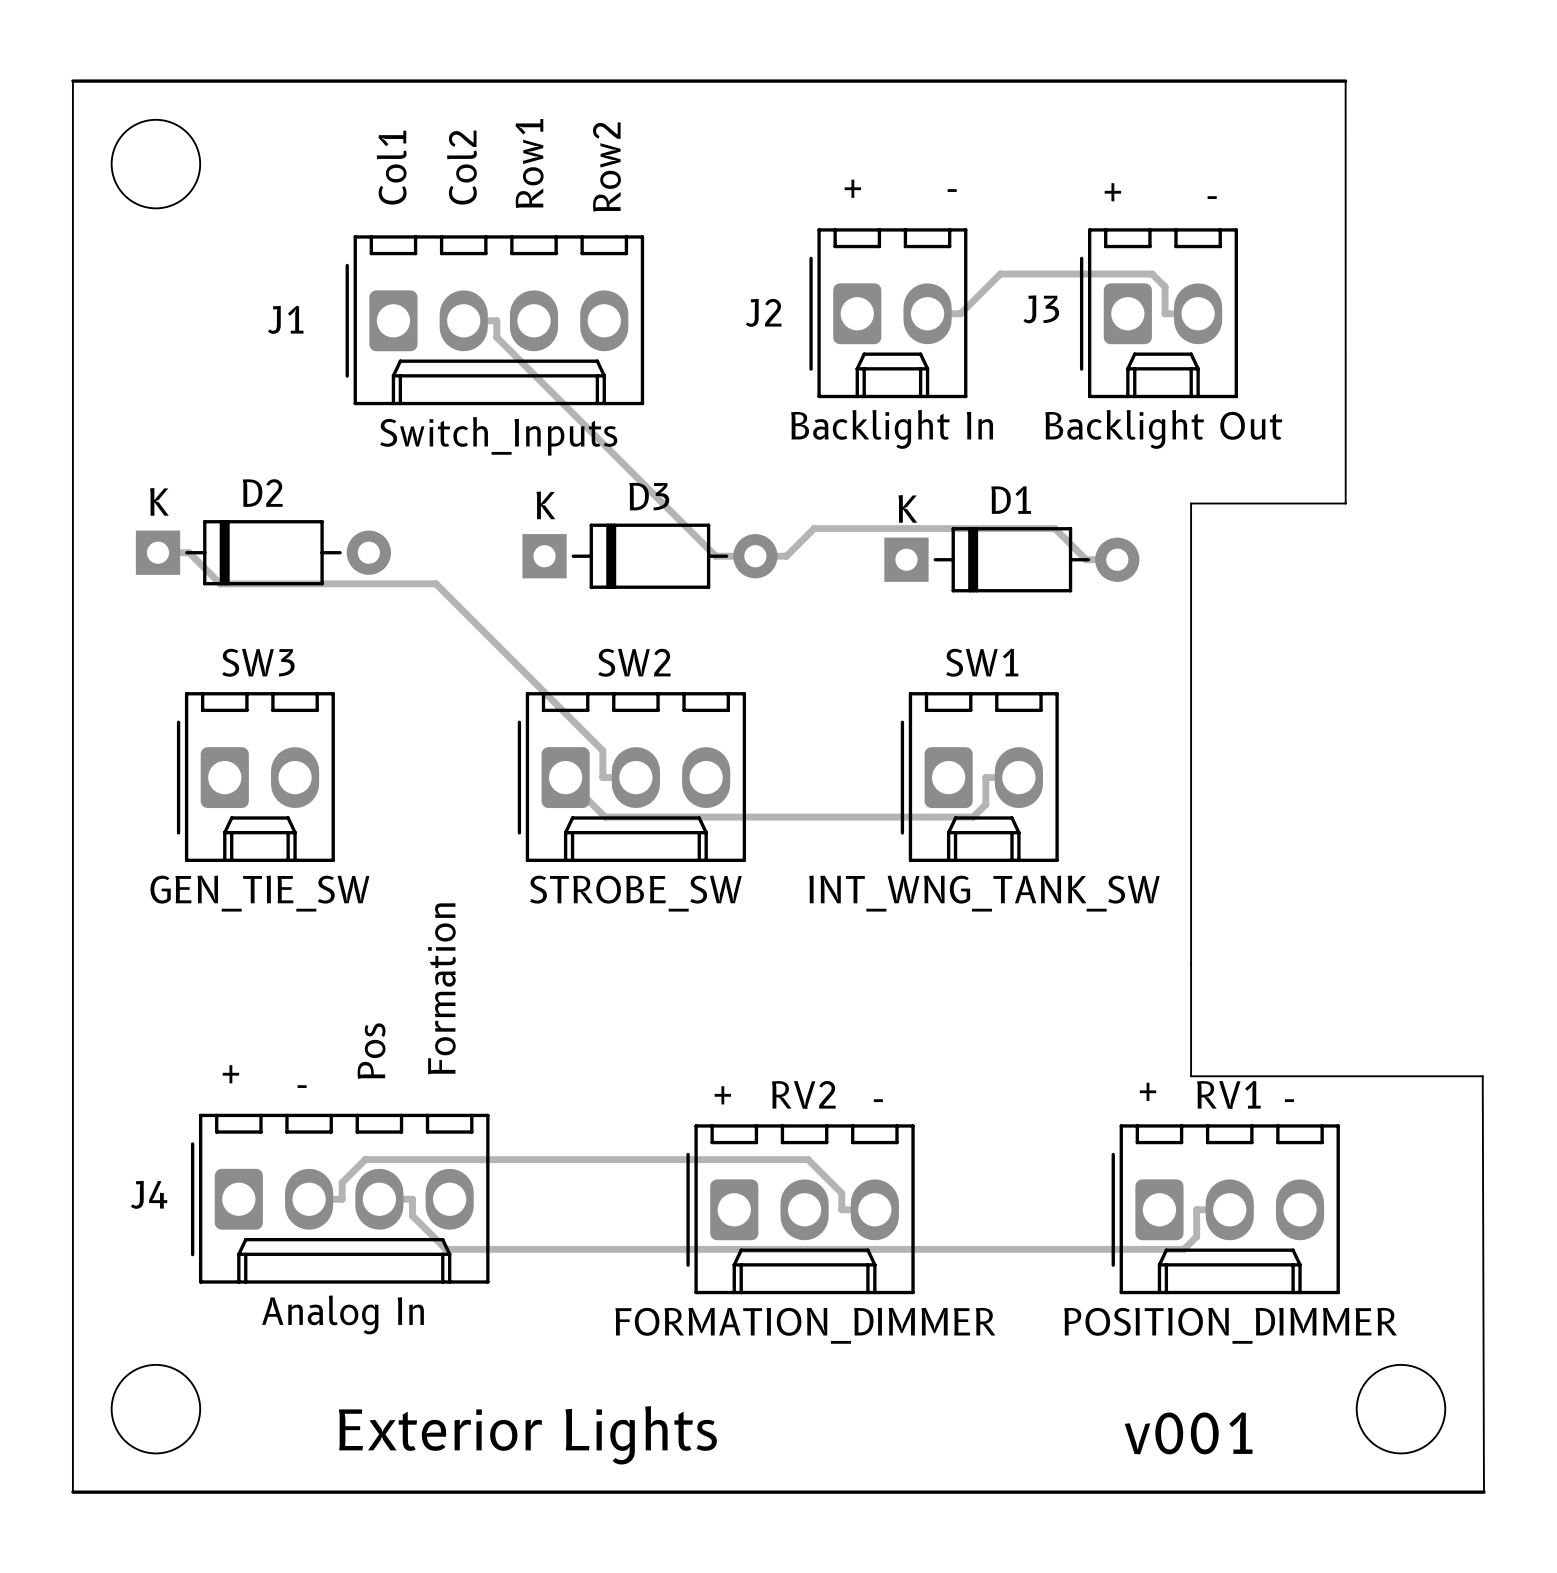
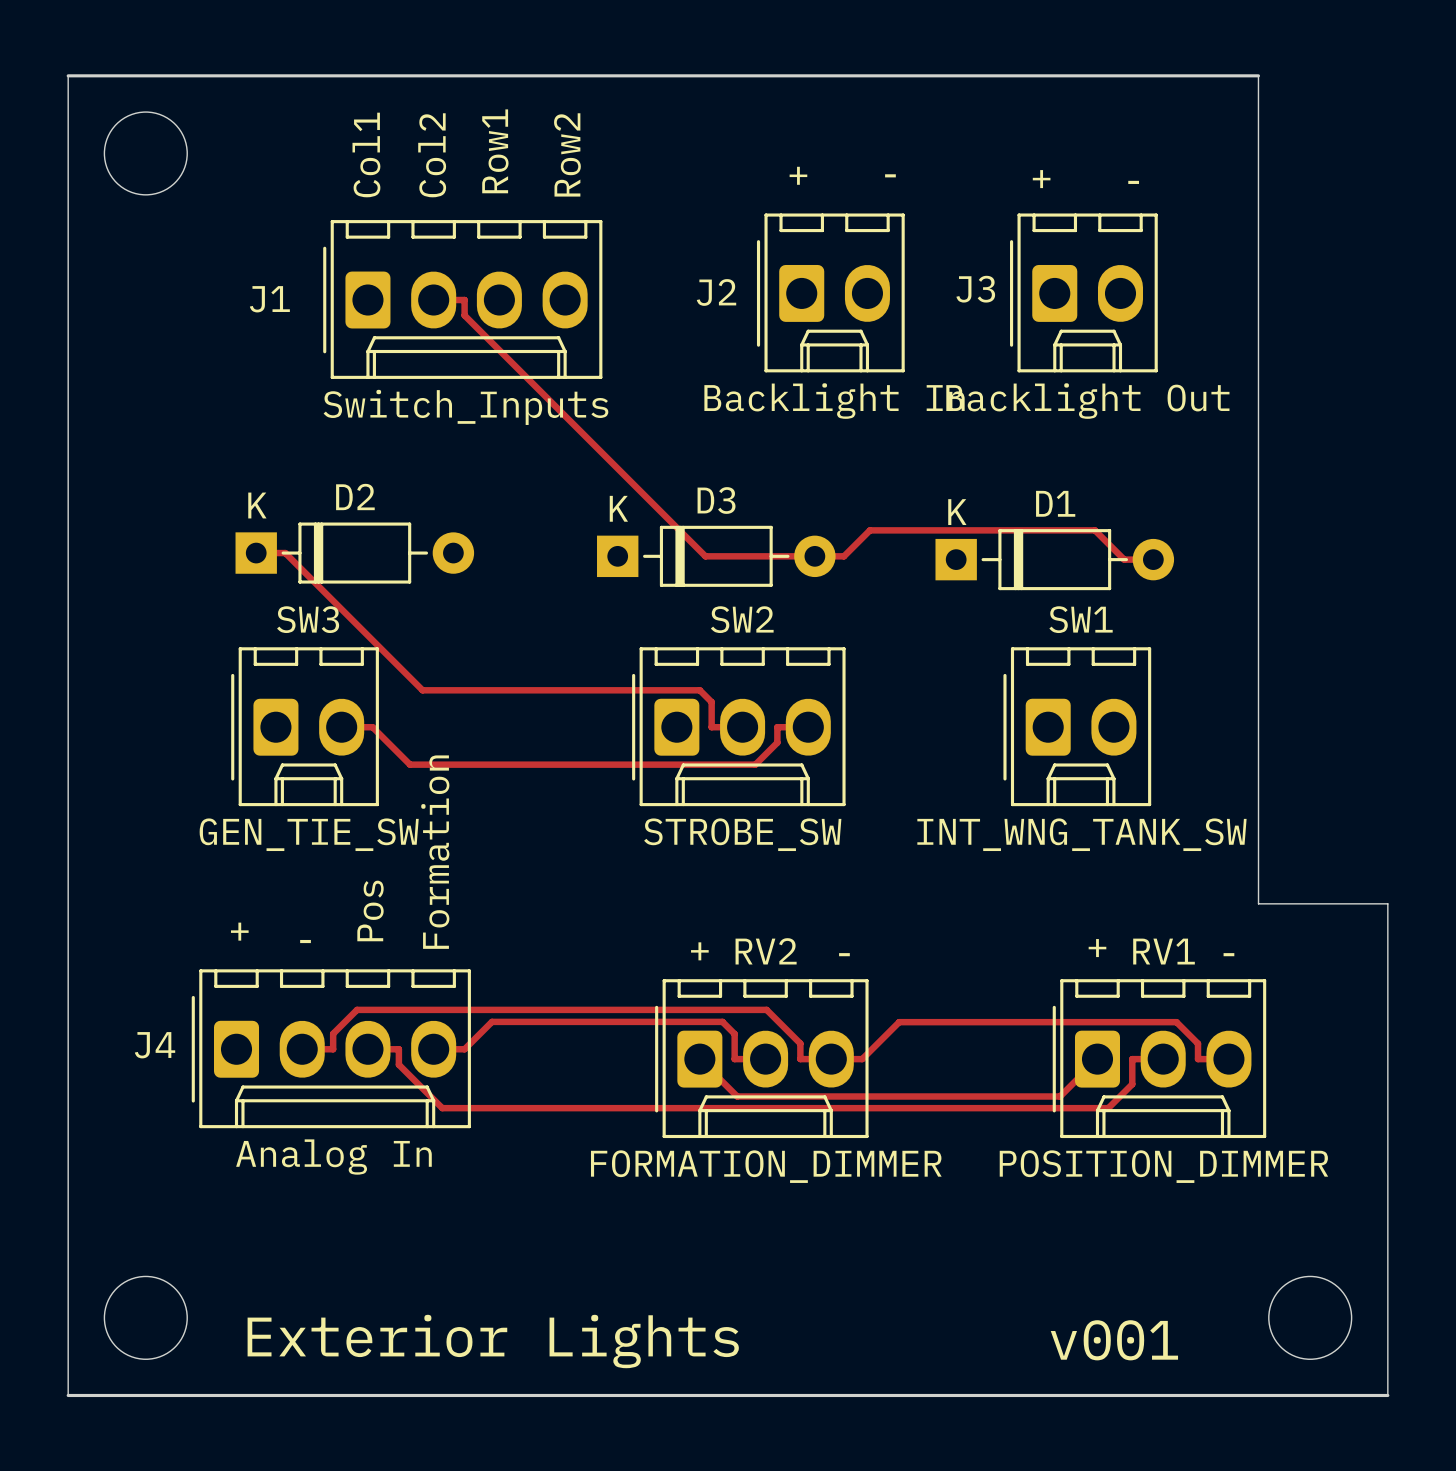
track: (927, 313) (960, 313) (1000, 274) (1152, 274) (1165, 286) (1165, 313) (1198, 313) -> none
board edge: (1345, 503) (1191, 503) (1191, 1076) (1482, 1076) (1483, 1492) -> (1258, 470) (1258, 903) (1387, 903) (1387, 1395)
track: (158, 552) (189, 552) (220, 583) (435, 583) (602, 750) (602, 777) (635, 777) -> none
D2 position: (263, 552) -> (354, 553)
D3 position: (649, 556) -> (716, 556)
track: (715, 556) (786, 556) (814, 528) (1055, 528) (1086, 559) (1117, 559) -> (669, 520) (705, 556) (844, 556) (869, 530) (1095, 530) (1124, 559) (1153, 559)
D1 position: (1011, 559) -> (1054, 559)
track: none -> (256, 553) (285, 553) (422, 690) (699, 690) (711, 702) (711, 727) (742, 727)
SW3 position: (255, 777) -> (305, 726)
track: none -> (341, 727) (372, 727) (410, 764) (755, 764) (777, 742) (777, 727) (808, 727)
track: (565, 777) (605, 817) (973, 817) (985, 804) (985, 777) (1018, 777) -> none
SW2 position: (631, 777) -> (738, 726)
SW1 position: (979, 777) -> (1077, 726)
text position: Formation (441, 988) -> Formation (435, 852)
text position: Pos (371, 1051) -> Pos (370, 910)
text position: + (230, 1074) -> + (239, 931)
text position: - (302, 1086) -> - (305, 941)
text position: + (1148, 1091) -> + (1097, 948)
text position: + (722, 1095) -> + (699, 951)
text position: - (878, 1100) -> - (844, 954)
text position: - (1289, 1100) -> - (1228, 954)
track: none -> (302, 1049) (333, 1049) (333, 1033) (357, 1009) (766, 1009) (800, 1043) (800, 1059) (862, 1059) (899, 1022) (1176, 1022) (1198, 1043) (1198, 1059) (1228, 1059)
track: none -> (367, 1049) (398, 1049) (398, 1064) (442, 1108) (1108, 1108) (1132, 1084) (1132, 1059) (1163, 1059)
track: none -> (433, 1049) (464, 1049) (491, 1021) (722, 1021) (734, 1033) (734, 1059) (765, 1059)
track: none -> (699, 1059) (737, 1096) (1060, 1096) (1097, 1059)
J4 position: (340, 1198) -> (331, 1048)
track: (309, 1199) (342, 1199) (342, 1182) (365, 1159) (808, 1159) (841, 1193) (841, 1209) (874, 1209) -> none
track: (379, 1199) (412, 1199) (412, 1215) (446, 1249) (1183, 1249) (1196, 1236) (1196, 1209) (1229, 1209) -> none
RV2 position: (800, 1209) -> (761, 1058)
RV1 position: (1225, 1209) -> (1159, 1058)

